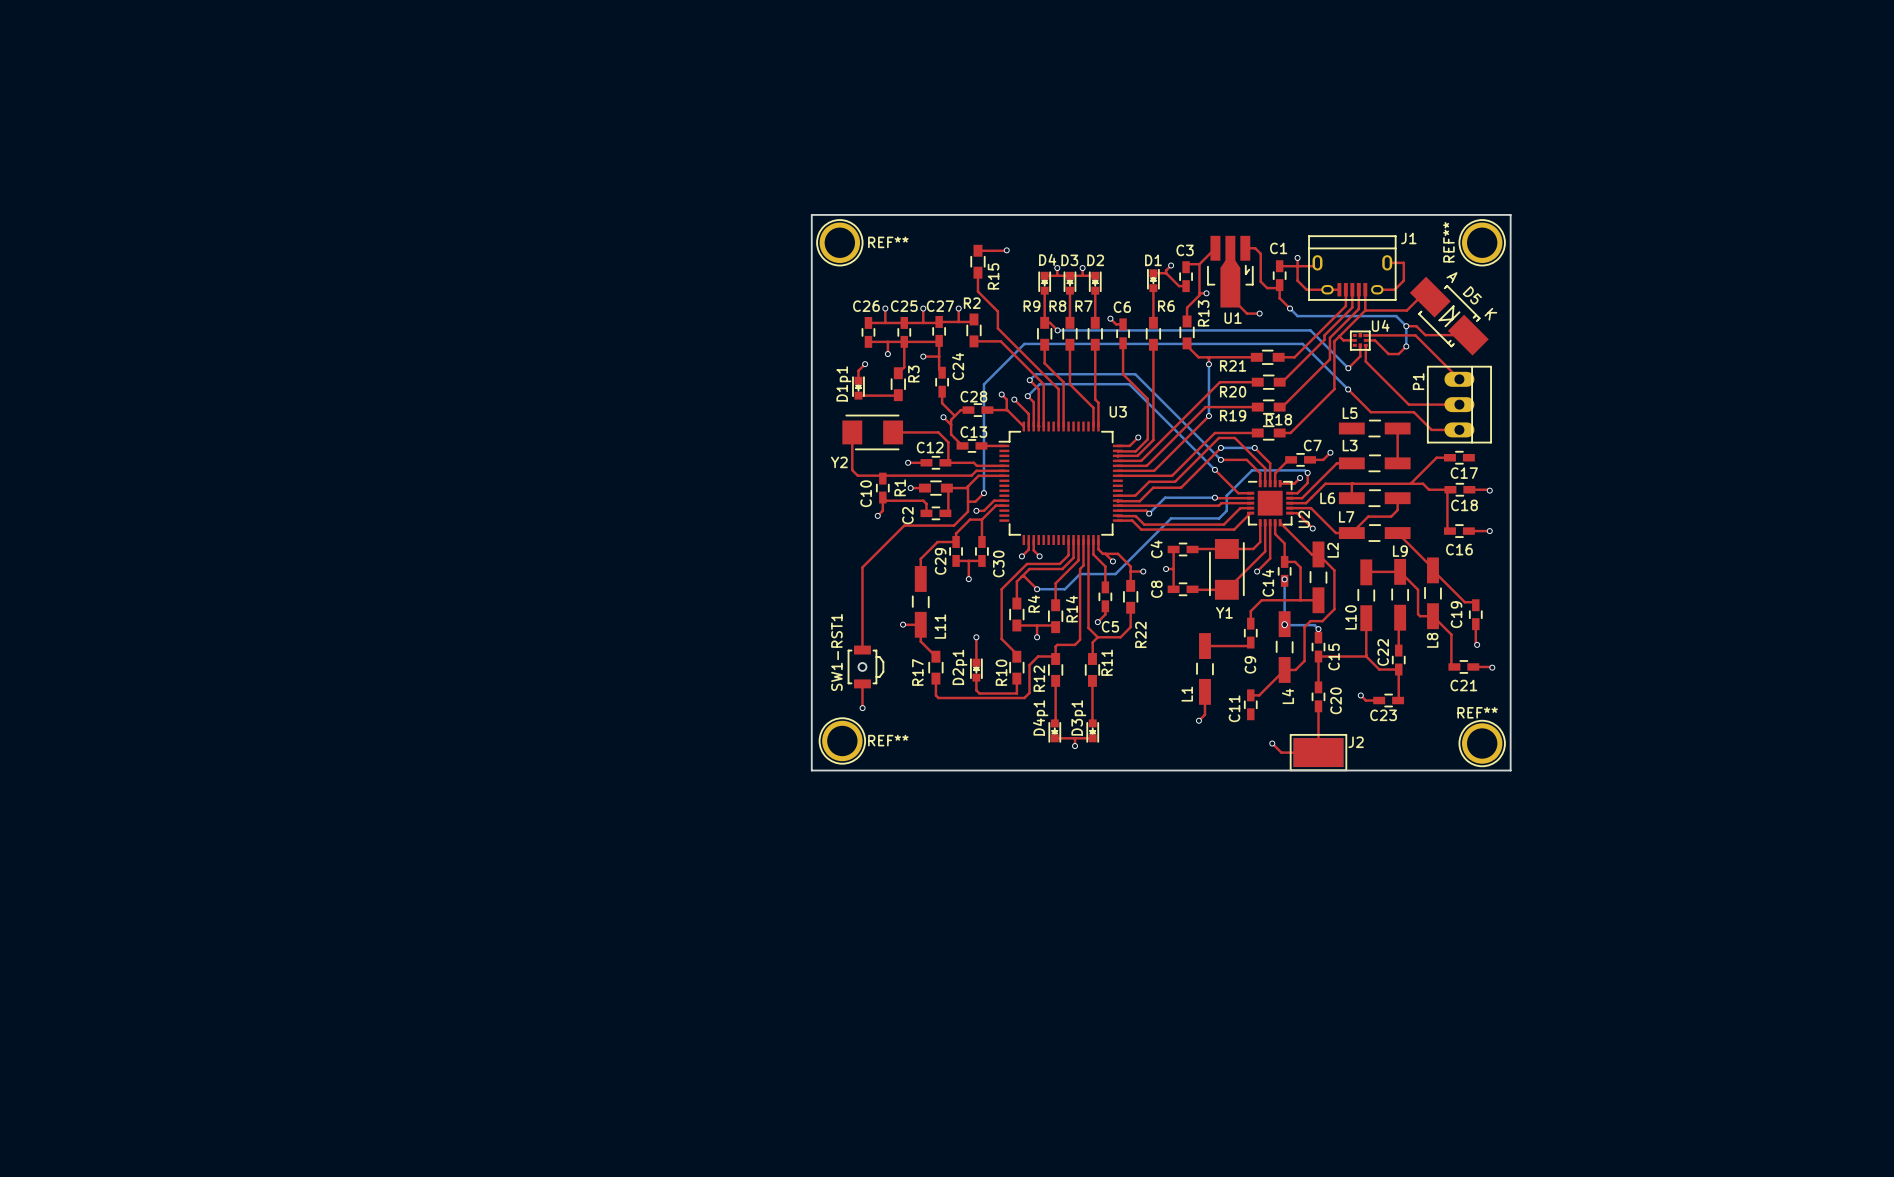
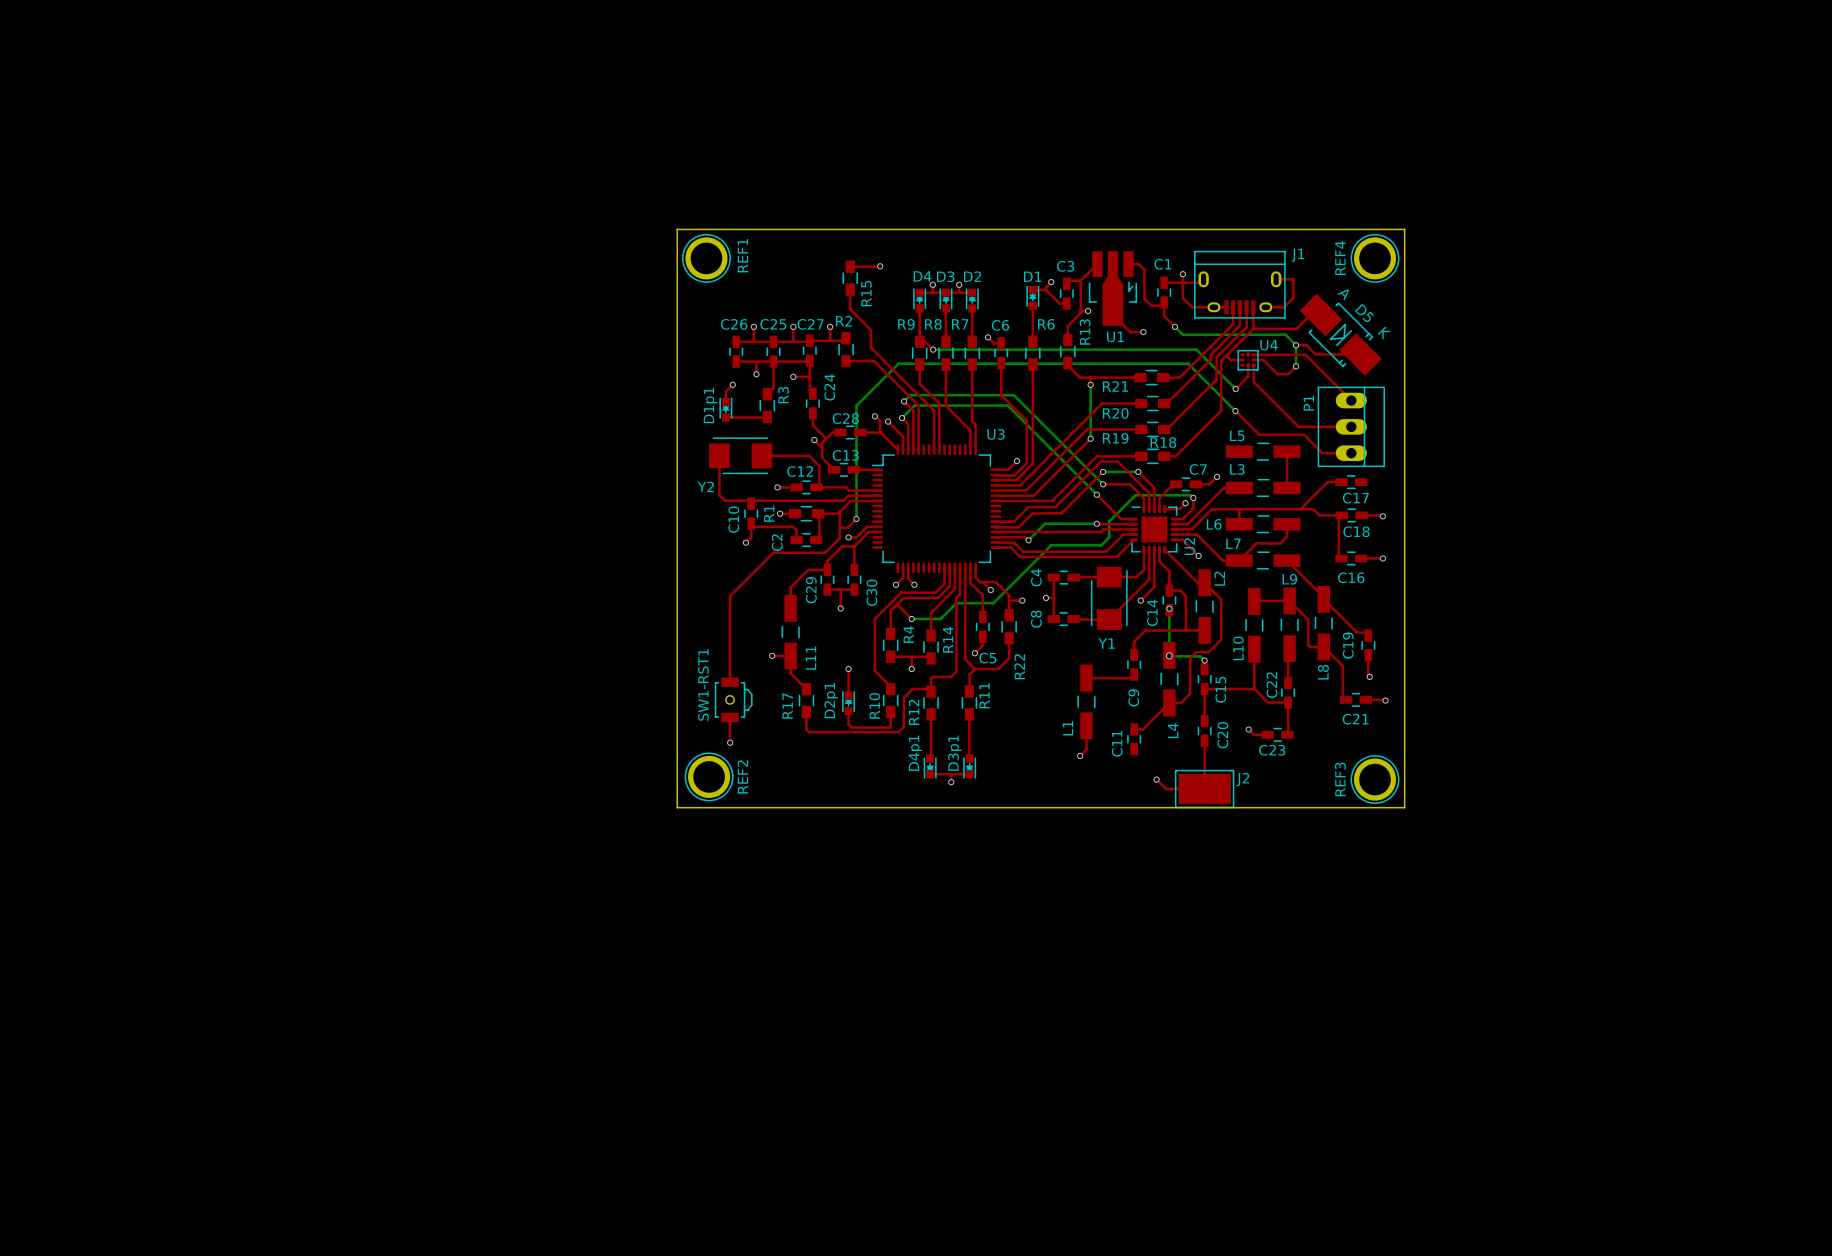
REF** name: REF** (888, 242) -> REF1 (742, 255)
REF** name: REF** (1448, 242) -> REF4 (1340, 258)
REF** name: REF** (1477, 712) -> REF3 (1340, 779)
REF** name: REF** (888, 740) -> REF2 (742, 776)

